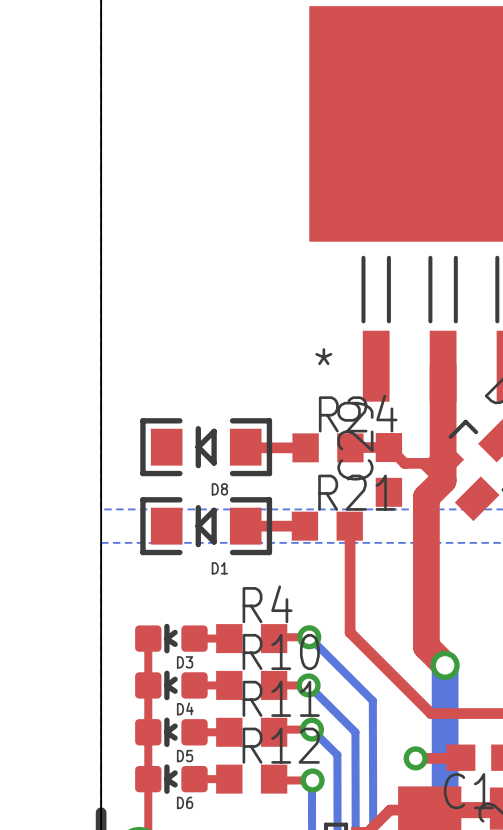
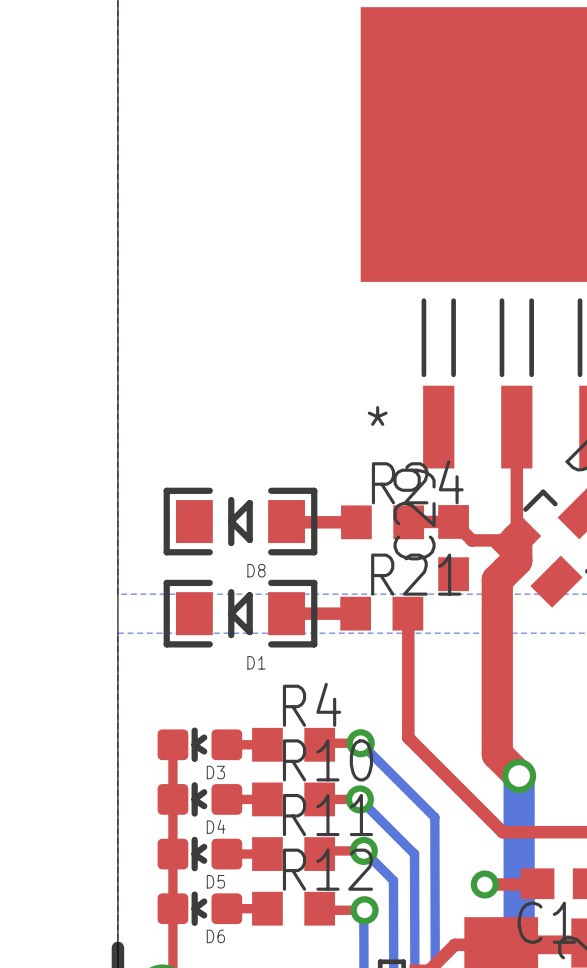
top track width: thick (443, 366) (443, 461) -> thin (516, 427) (516, 538)

